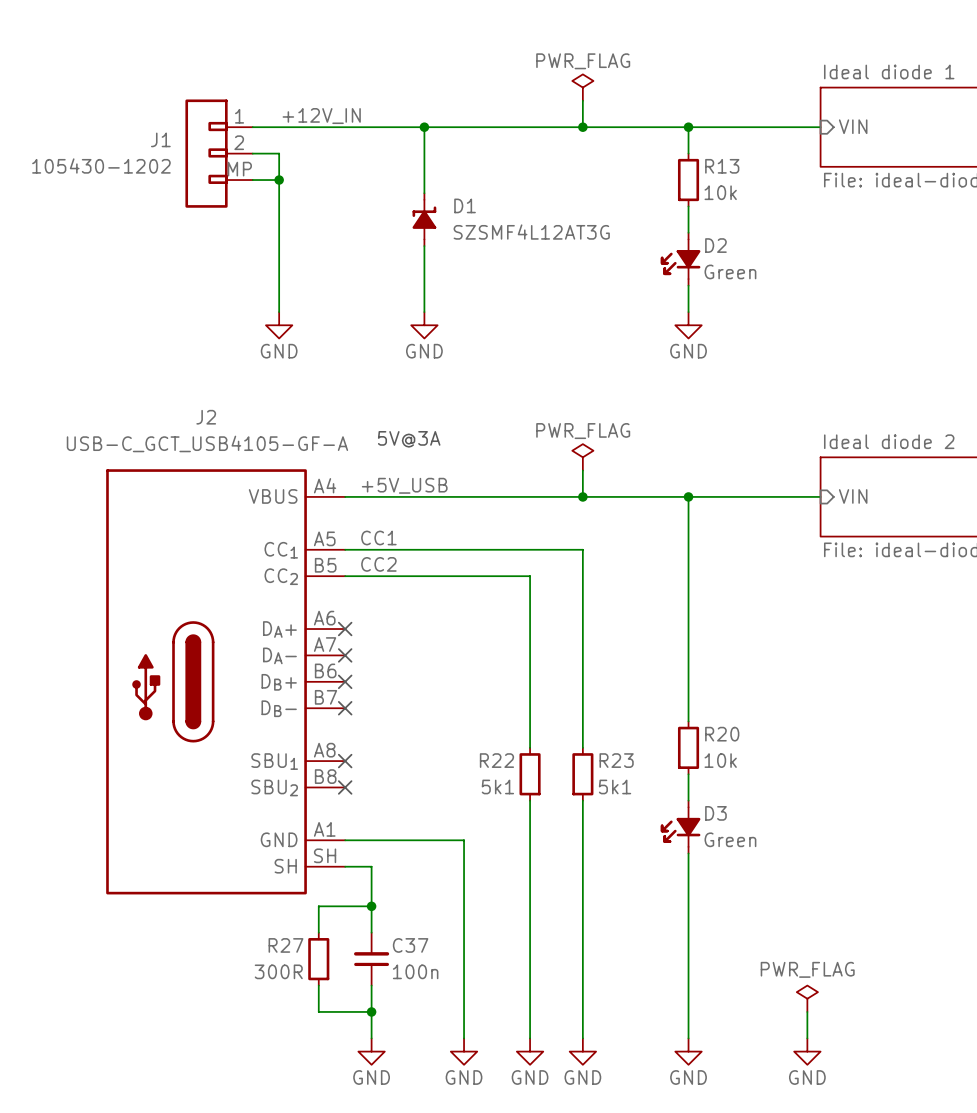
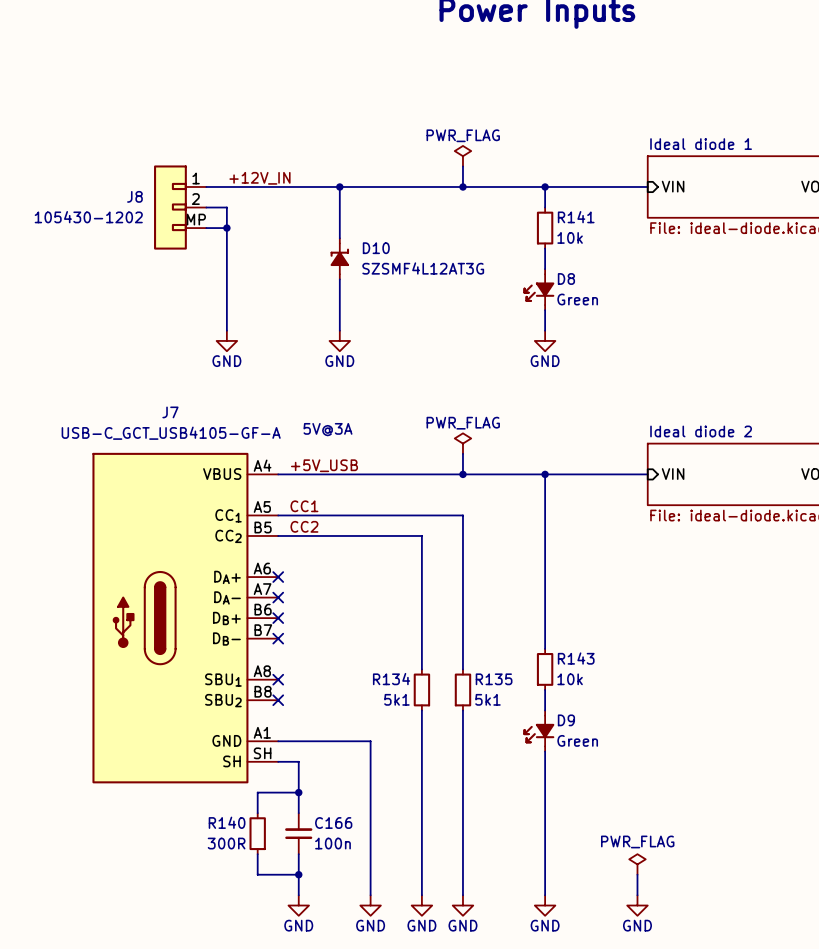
J1 name: J1 (160, 139) -> J8 (134, 196)
R13 name: R13 (722, 166) -> R141 (576, 217)
D1 name: D1 (465, 205) -> D10 (376, 248)
D2 name: D2 (715, 245) -> D8 (566, 278)
J2 name: J2 (206, 417) -> J7 (170, 412)
R20 name: R20 (722, 734) -> R143 (576, 658)
R22 name: R22 (496, 760) -> R134 (391, 679)
R23 name: R23 (616, 760) -> R135 (494, 679)
D3 name: D3 (715, 813) -> D9 (566, 720)
R27 name: R27 (285, 945) -> R140 (227, 822)
C37 name: C37 (410, 945) -> C166 (333, 823)

